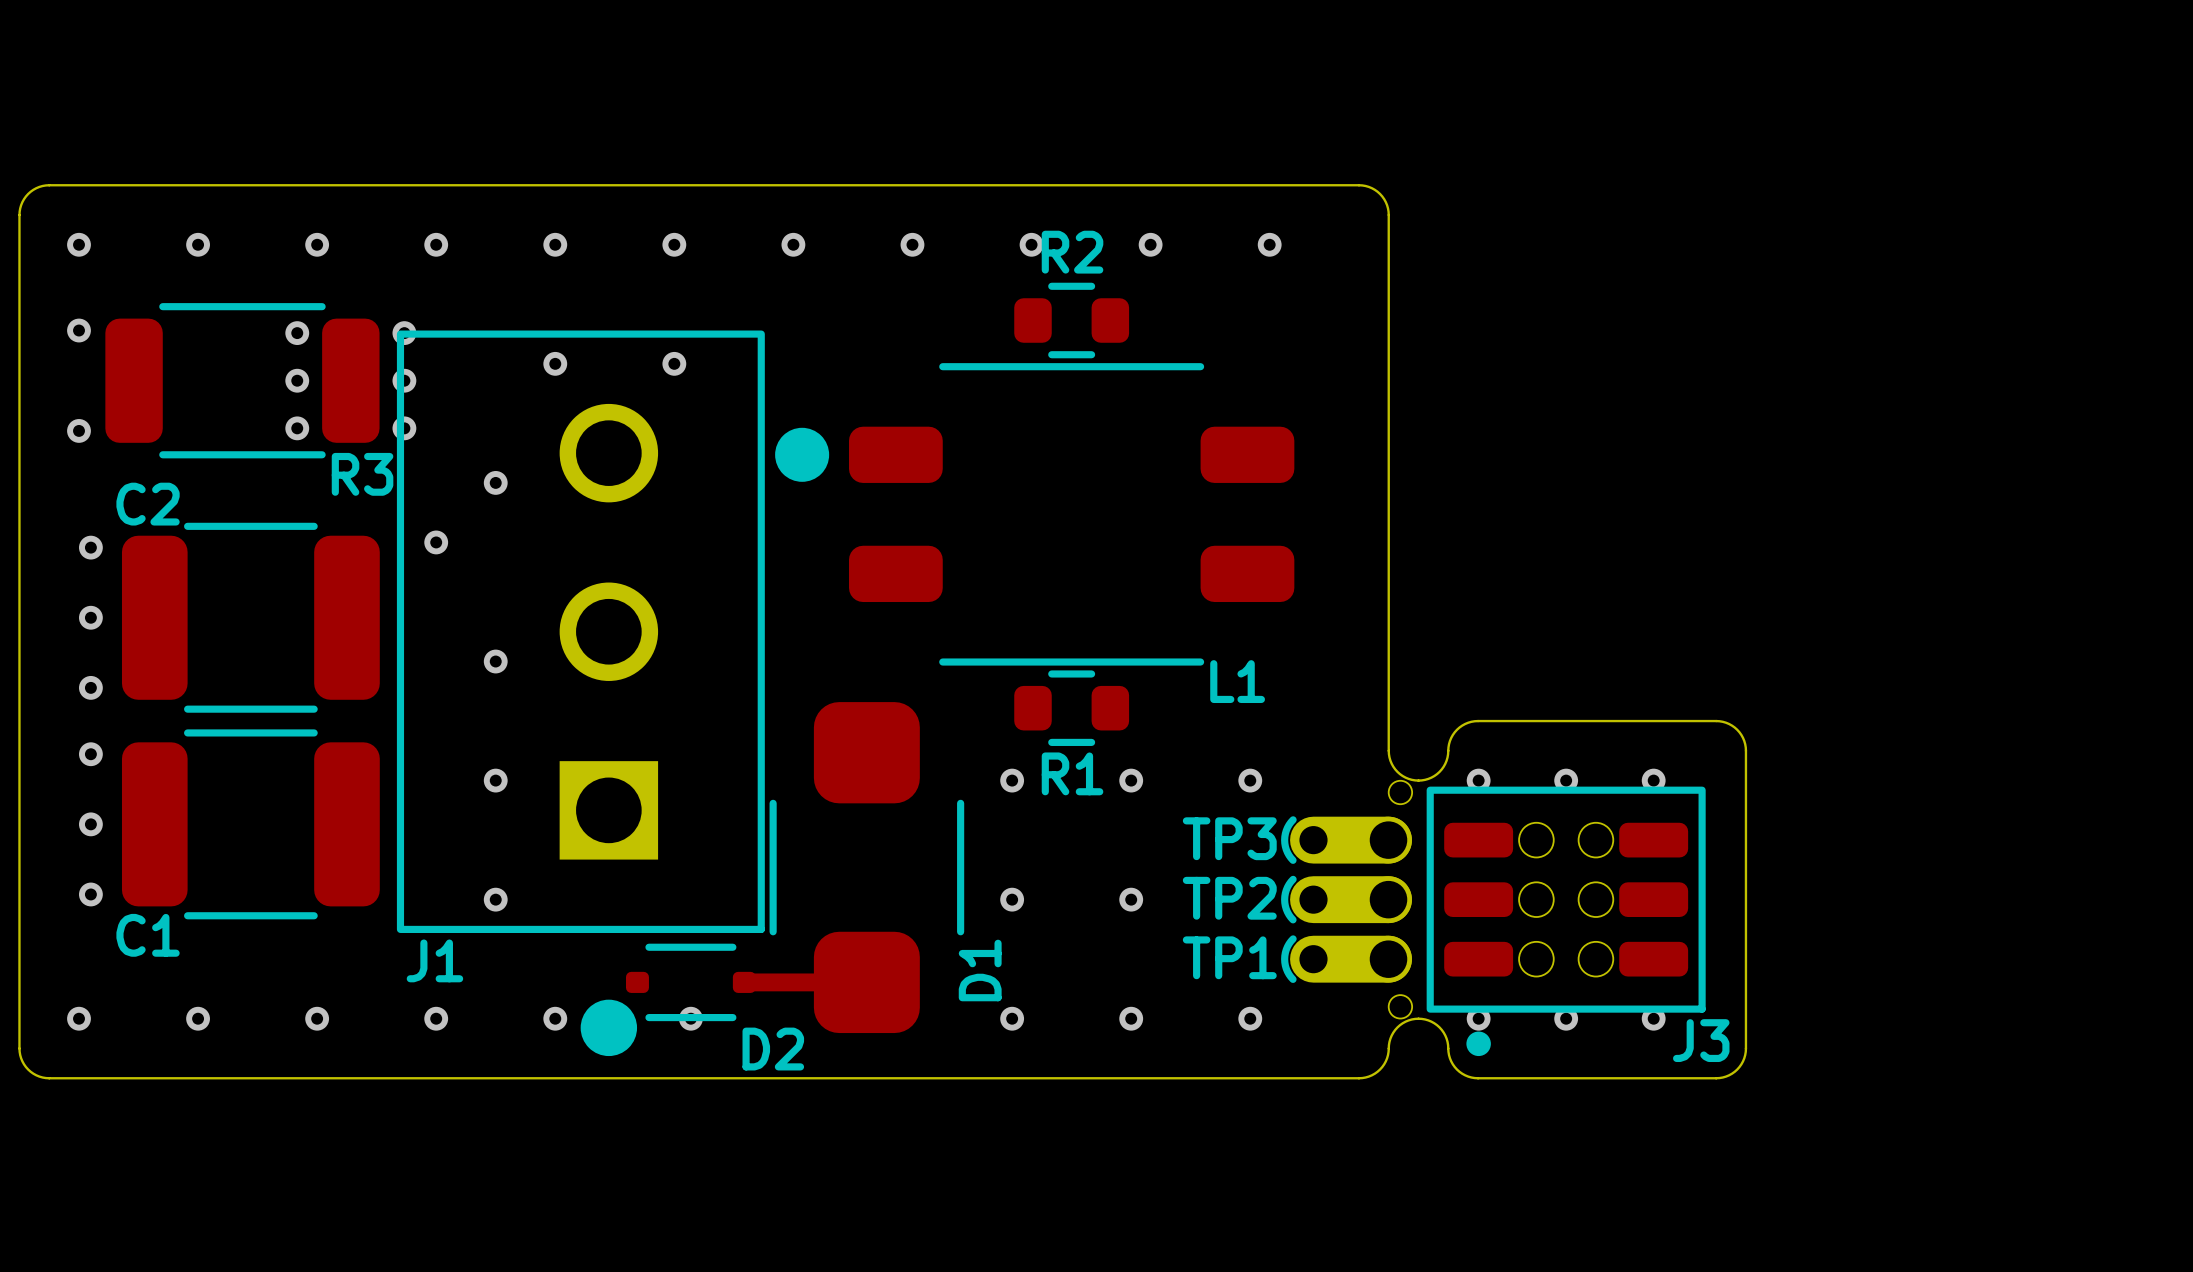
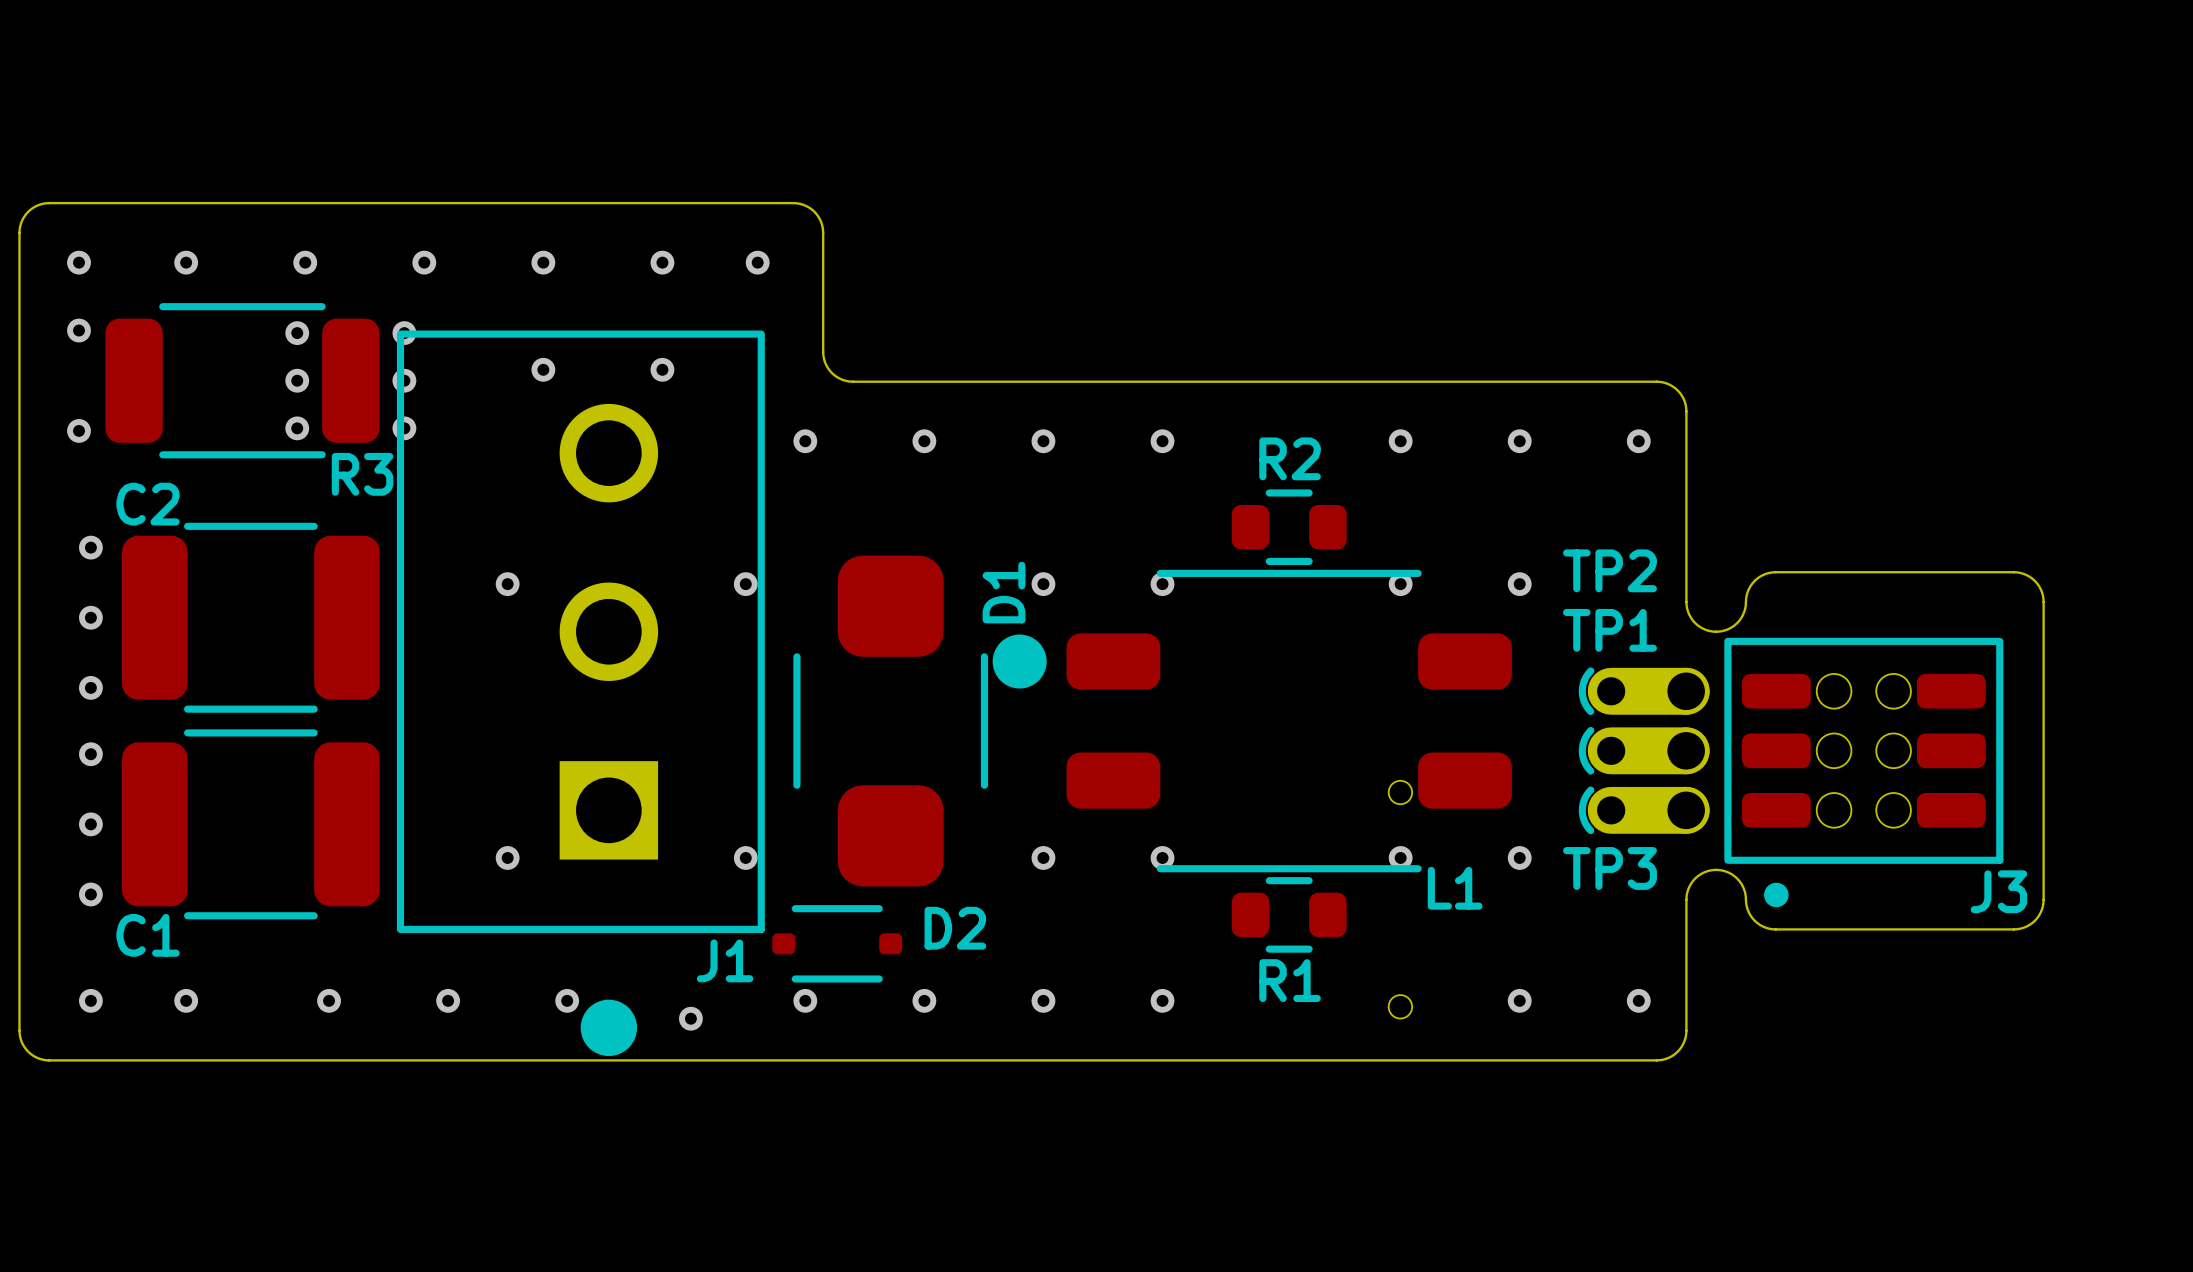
board edge: (19, 232) (19, 211) (24, 199) (33, 189) (49, 185) (1358, 185) (1371, 188) (1384, 199) (1388, 215) (1388, 750) (1391, 763) (1397, 771) (1408, 778) (1421, 780) (1431, 777) (1439, 771) (1445, 763) (1449, 740) (1454, 732) (1462, 725) (1474, 721) (1716, 721) (1726, 722) (1734, 727) (1743, 737) (1745, 750) (1745, 1048) (1744, 1058) (1739, 1067) (1732, 1073) (1719, 1078) (1474, 1078) (1462, 1073) (1452, 1064) (1449, 1055) (1446, 1038) (1439, 1027) (1431, 1021) (1418, 1018) (1405, 1021) (1397, 1027) (1390, 1038) (1388, 1055) (1382, 1067) (1371, 1075) (1358, 1078) (49, 1078) (36, 1075) (24, 1064) (19, 1051) (19, 1030) -> (19, 232) (22, 219) (28, 211) (36, 206) (49, 203) (800, 203) (814, 211) (822, 226) (823, 355) (829, 370) (843, 380) (852, 381) (1663, 382) (1672, 386) (1679, 392) (1686, 408) (1686, 605) (1690, 617) (1700, 627) (1709, 631) (1719, 631) (1734, 625) (1743, 614) (1747, 592) (1752, 583) (1762, 575) (1772, 572) (2017, 572) (2026, 575) (2034, 580) (2040, 589) (2043, 601) (2043, 899) (2041, 909) (2037, 918) (2026, 926) (2013, 929) (1772, 929) (1759, 924) (1752, 918) (1747, 909) (1743, 886) (1734, 876) (1722, 870) (1706, 871) (1692, 881) (1686, 896) (1685, 1037) (1677, 1051) (1663, 1059) (49, 1060) (39, 1058) (28, 1051) (21, 1040) (19, 1030)
via position: (79, 244) -> (79, 262)
via position: (198, 244) -> (186, 262)
via position: (317, 244) -> (305, 262)
via position: (436, 244) -> (424, 262)
via position: (555, 244) -> (543, 262)
via position: (674, 244) -> (662, 262)
via position: (793, 244) -> (757, 262)
via: (912, 244) -> none
via: (1031, 244) -> none
via: (1150, 244) -> none
via: (1269, 244) -> none
R2 position: (1071, 320) -> (1289, 527)
via position: (555, 363) -> (543, 369)
via position: (674, 363) -> (662, 369)
via: none -> (805, 441)
via: none -> (924, 441)
via: none -> (1043, 441)
via: none -> (1162, 441)
via: none -> (1400, 441)
via: none -> (1519, 441)
via: none -> (1638, 441)
via: (495, 482) -> none
L1 position: (1034, 514) -> (1252, 721)
via: (436, 542) -> none
via: none -> (507, 584)
via: none -> (745, 584)
via: none -> (1043, 584)
via: none -> (1162, 584)
via: none -> (1400, 584)
via: none -> (1519, 584)
via: (495, 661) -> none
R1 position: (1071, 708) -> (1289, 914)
via: (495, 780) -> none
via: (1012, 780) -> none
via: (1131, 780) -> none
via: (1250, 780) -> none
via: (1478, 780) -> none
via: (1566, 780) -> none
via: (1653, 780) -> none
TP3 name position: TP3 (1229, 838) -> TP3 (1609, 868)
TP3 position: (1346, 840) -> (1644, 810)
via: none -> (507, 857)
via: none -> (745, 857)
via: none -> (1043, 857)
via: none -> (1162, 857)
via: none -> (1400, 857)
via: none -> (1519, 857)
D1 position: (866, 867) -> (890, 721)
TP2 name position: TP2 (1229, 898) -> TP2 (1609, 570)
via: (495, 899) -> none
via: (1012, 899) -> none
via: (1131, 899) -> none
TP2 position: (1346, 899) -> (1644, 691)
J3 position: (1566, 921) -> (1863, 772)
TP1 name position: TP1 (1229, 957) -> TP1 (1609, 630)
TP1 position: (1346, 959) -> (1644, 750)
J1 name position: J1 (434, 960) -> J1 (725, 960)
D1 name position: D1 (980, 970) -> D1 (1004, 592)
D2 position: (690, 982) -> (837, 943)
track: (744, 982) (866, 982) -> none
via: none -> (805, 1000)
via: none -> (924, 1000)
via: none -> (1519, 1000)
via position: (79, 1018) -> (90, 1000)
via position: (198, 1018) -> (186, 1000)
via position: (317, 1018) -> (329, 1000)
via position: (436, 1018) -> (448, 1000)
via position: (555, 1018) -> (567, 1000)
via position: (1012, 1018) -> (1043, 1000)
via position: (1131, 1018) -> (1162, 1000)
via: (1250, 1018) -> none
via: (1478, 1018) -> none
via: (1566, 1018) -> none
via position: (1653, 1018) -> (1638, 1000)
D2 name position: D2 (773, 1049) -> D2 (955, 928)

